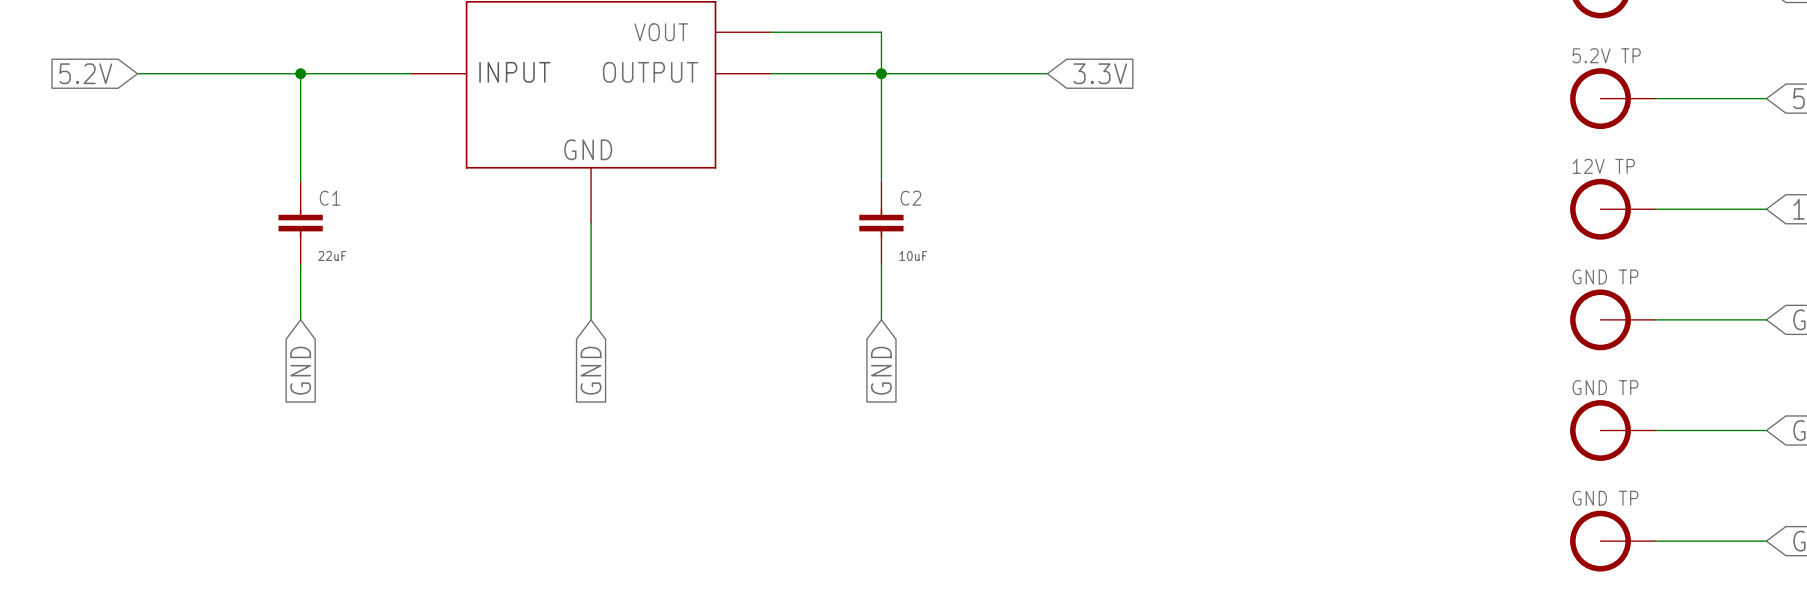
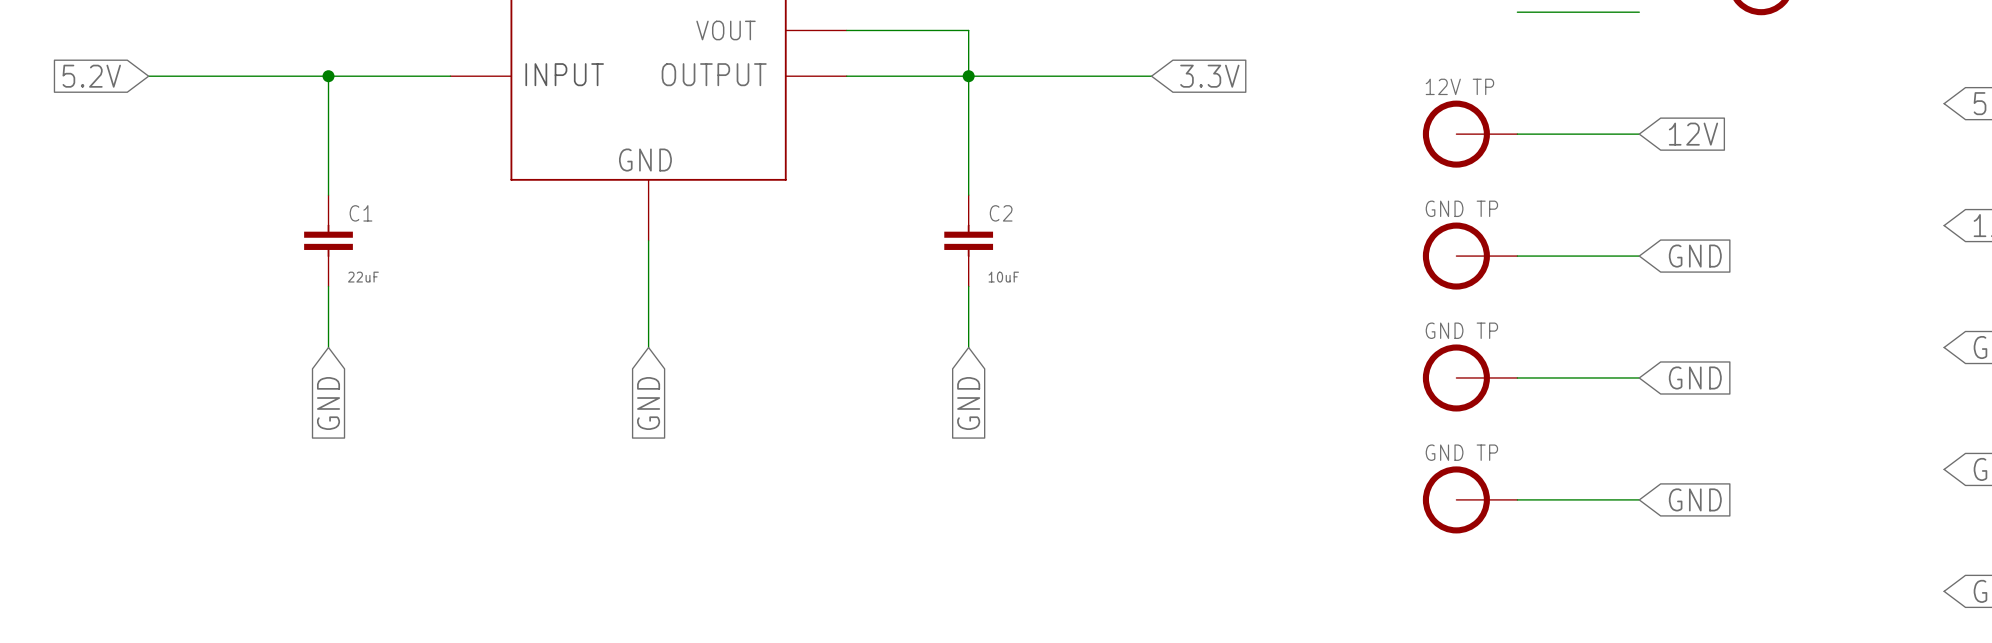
wire: none -> (1517, 12) (1639, 12)
part: (1612, 98) -> none
wire: (1655, 98) (1766, 98) -> none
part: none -> (1470, 134)
wire: none -> (1517, 134) (1639, 134)
global label: none -> 12V (1693, 134)
part: (1612, 209) -> none
wire: (1655, 209) (1766, 209) -> none
part: none -> (1470, 256)
wire: none -> (1517, 256) (1639, 256)
global label: none -> GND (1695, 256)
part: (1612, 319) -> none
wire: (1655, 319) (1766, 319) -> none
part: none -> (1470, 377)
wire: none -> (1517, 377) (1639, 377)
global label: none -> GND (1695, 377)
part: (1612, 430) -> none
wire: (1655, 430) (1766, 430) -> none
part: none -> (1470, 499)
wire: none -> (1517, 499) (1639, 499)
global label: none -> GND (1695, 499)
part: (1612, 541) -> none
wire: (1655, 541) (1766, 541) -> none

